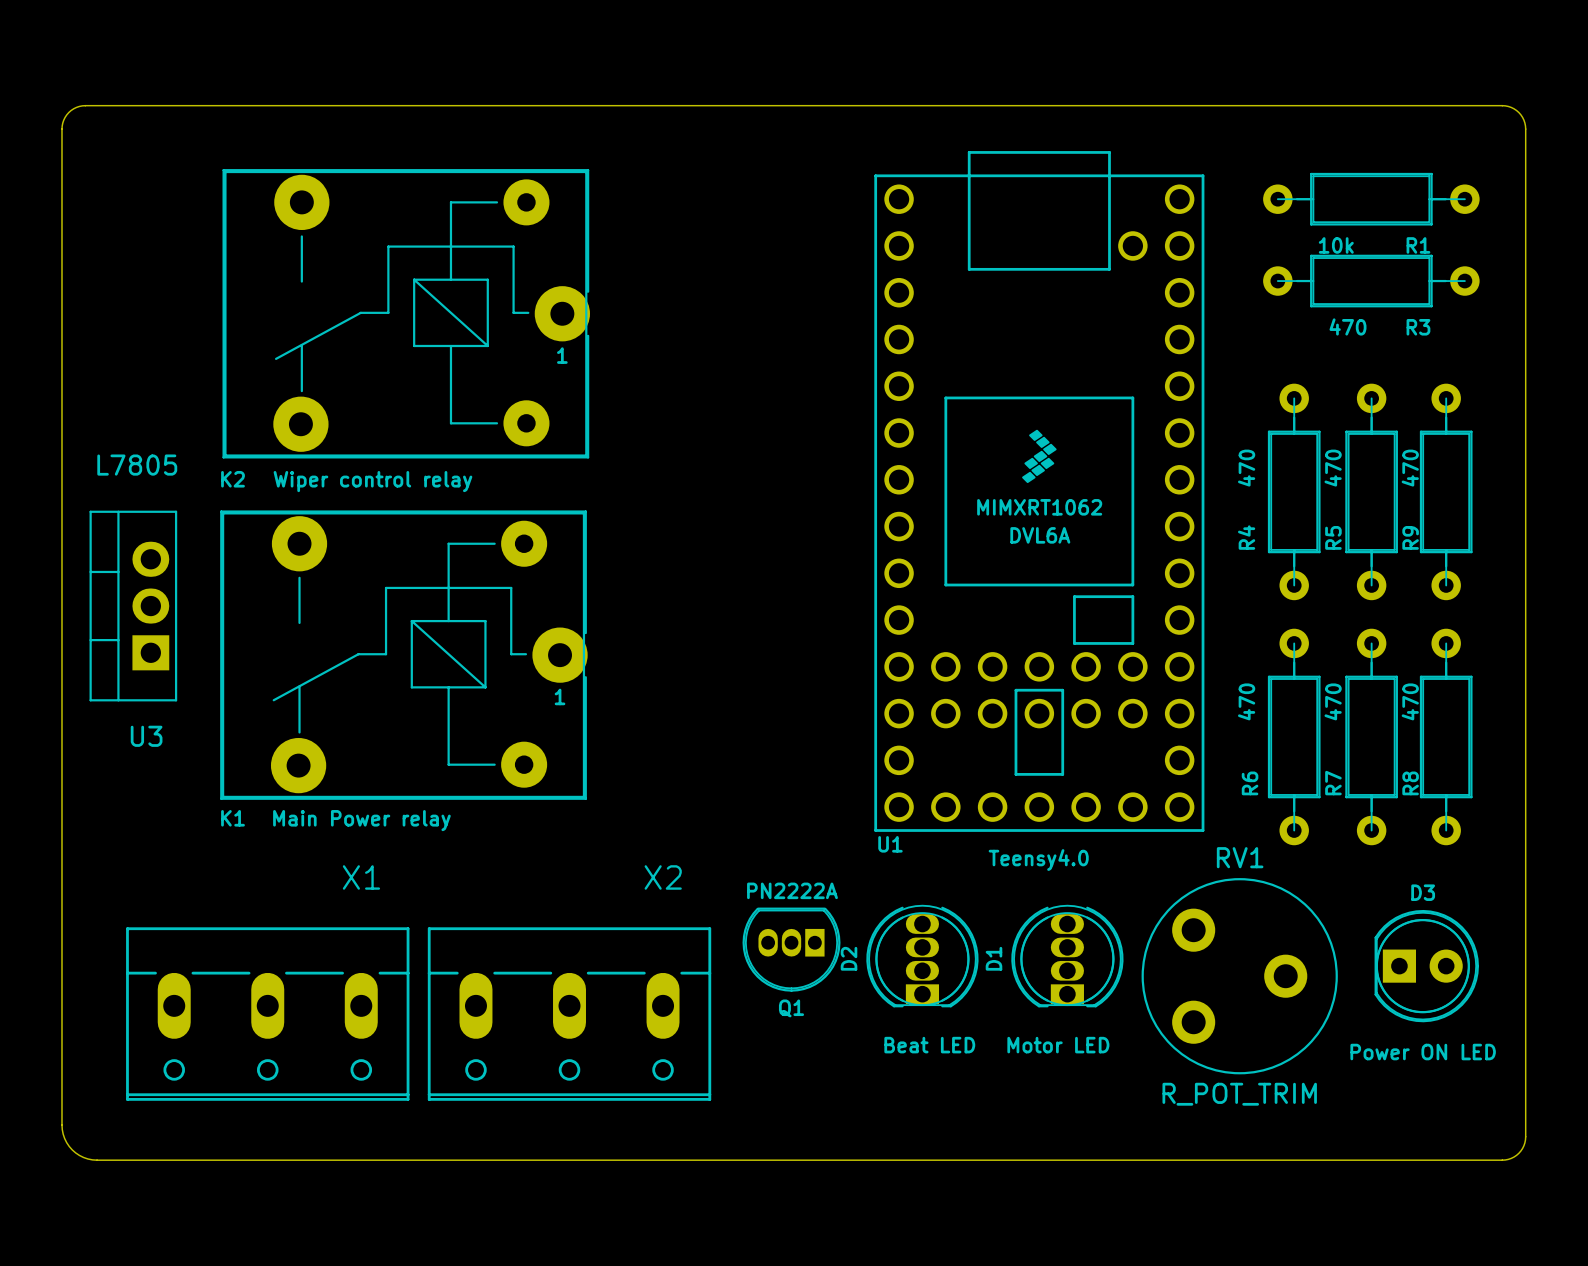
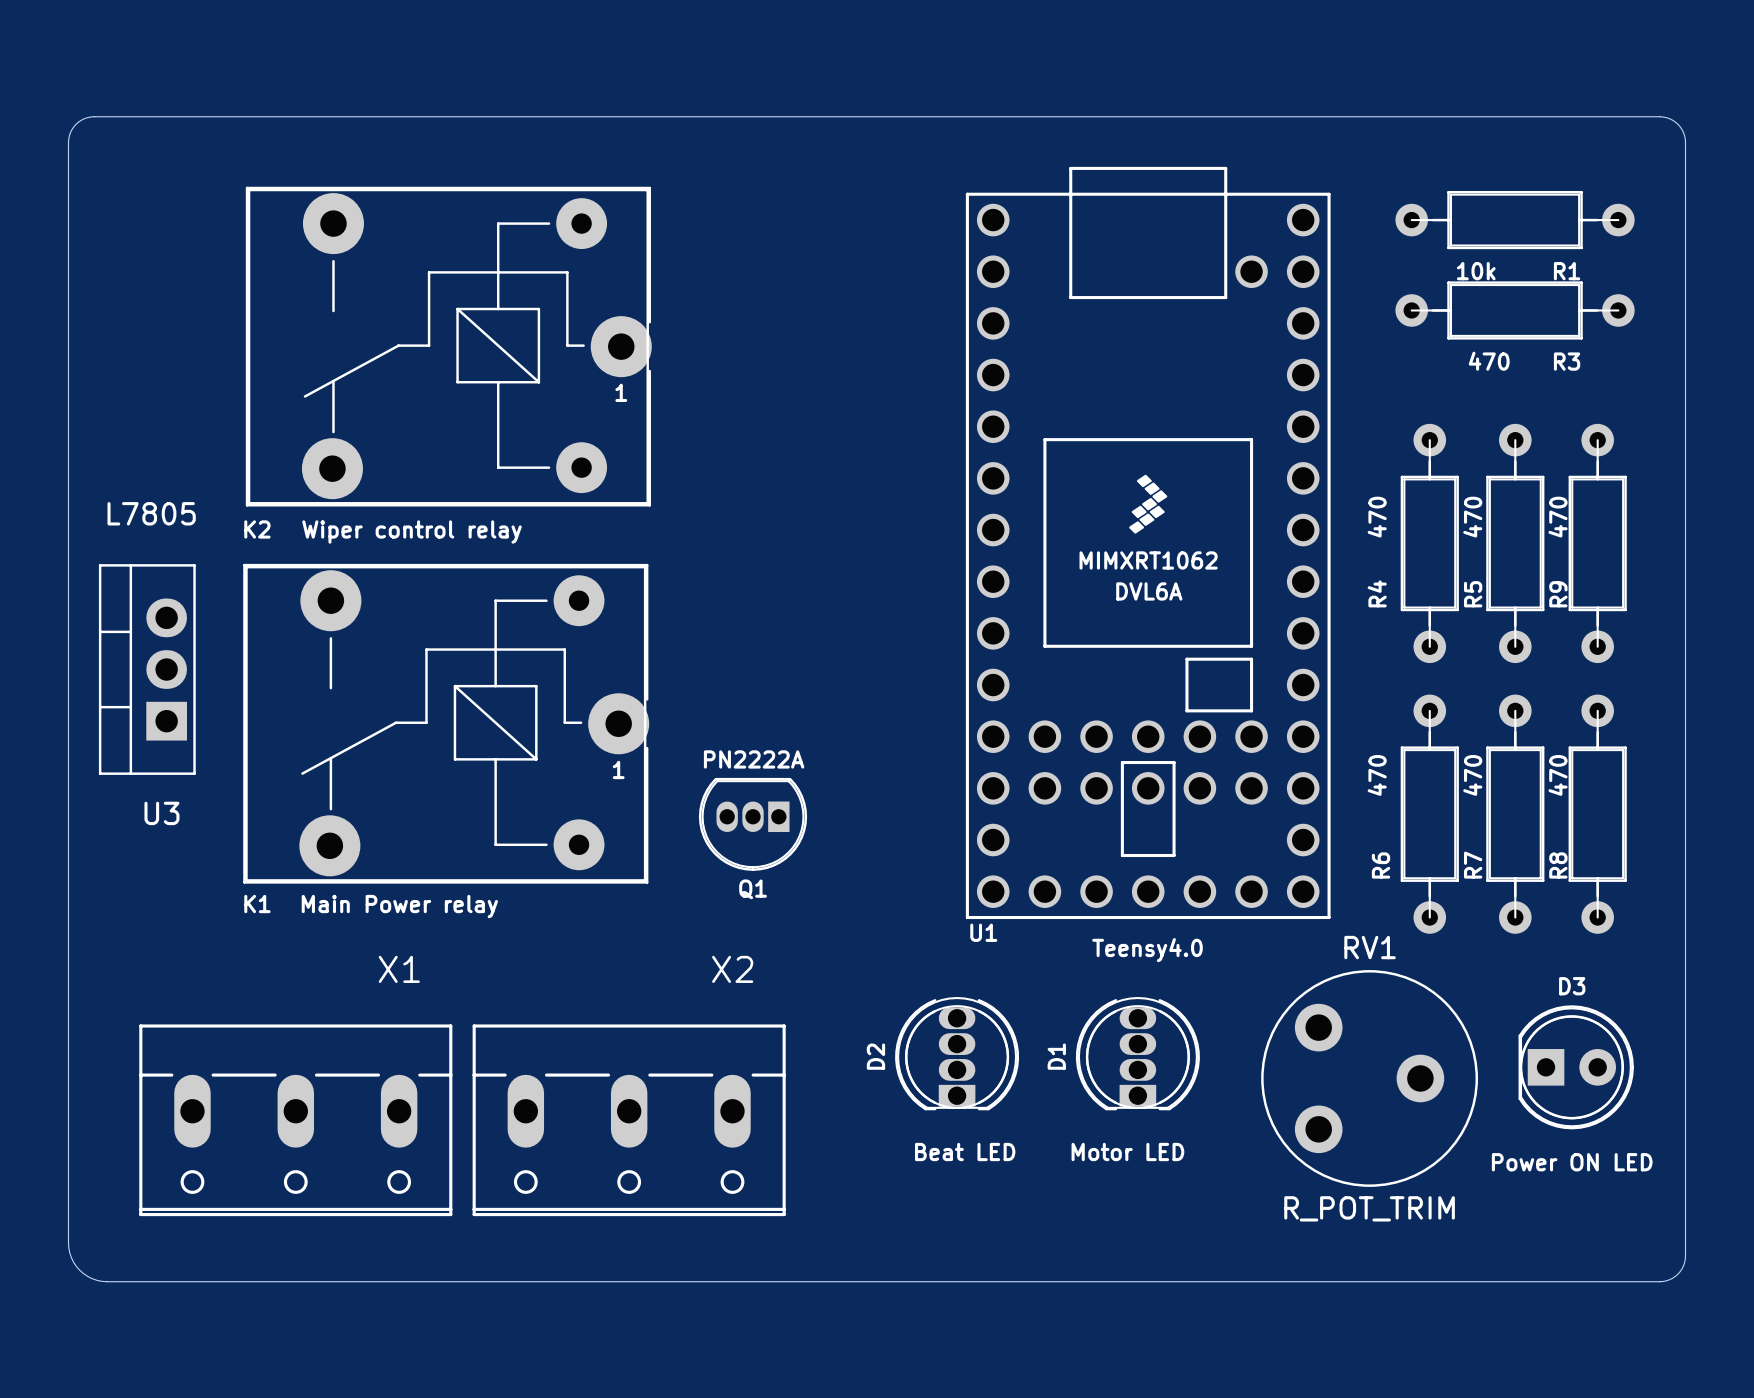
Q1 position: (791, 949) -> (753, 824)
D2 position: (922, 956) -> (957, 1053)
D1 position: (1067, 956) -> (1137, 1053)

